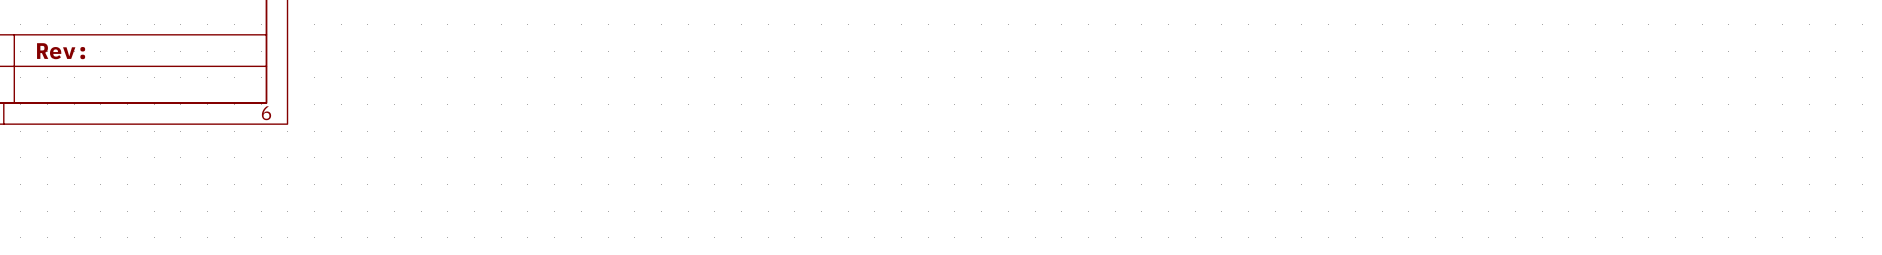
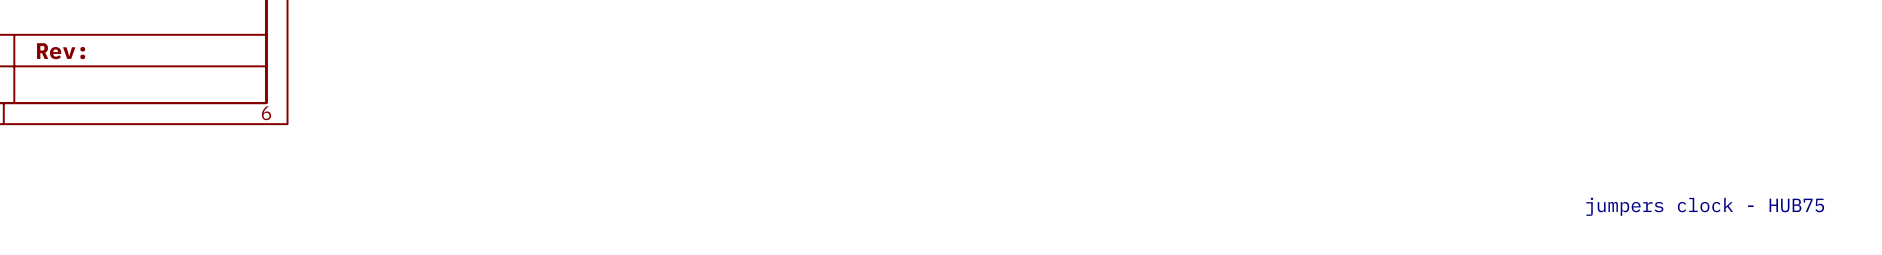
text: none -> jumpers clock - HUB75 (1705, 206)

